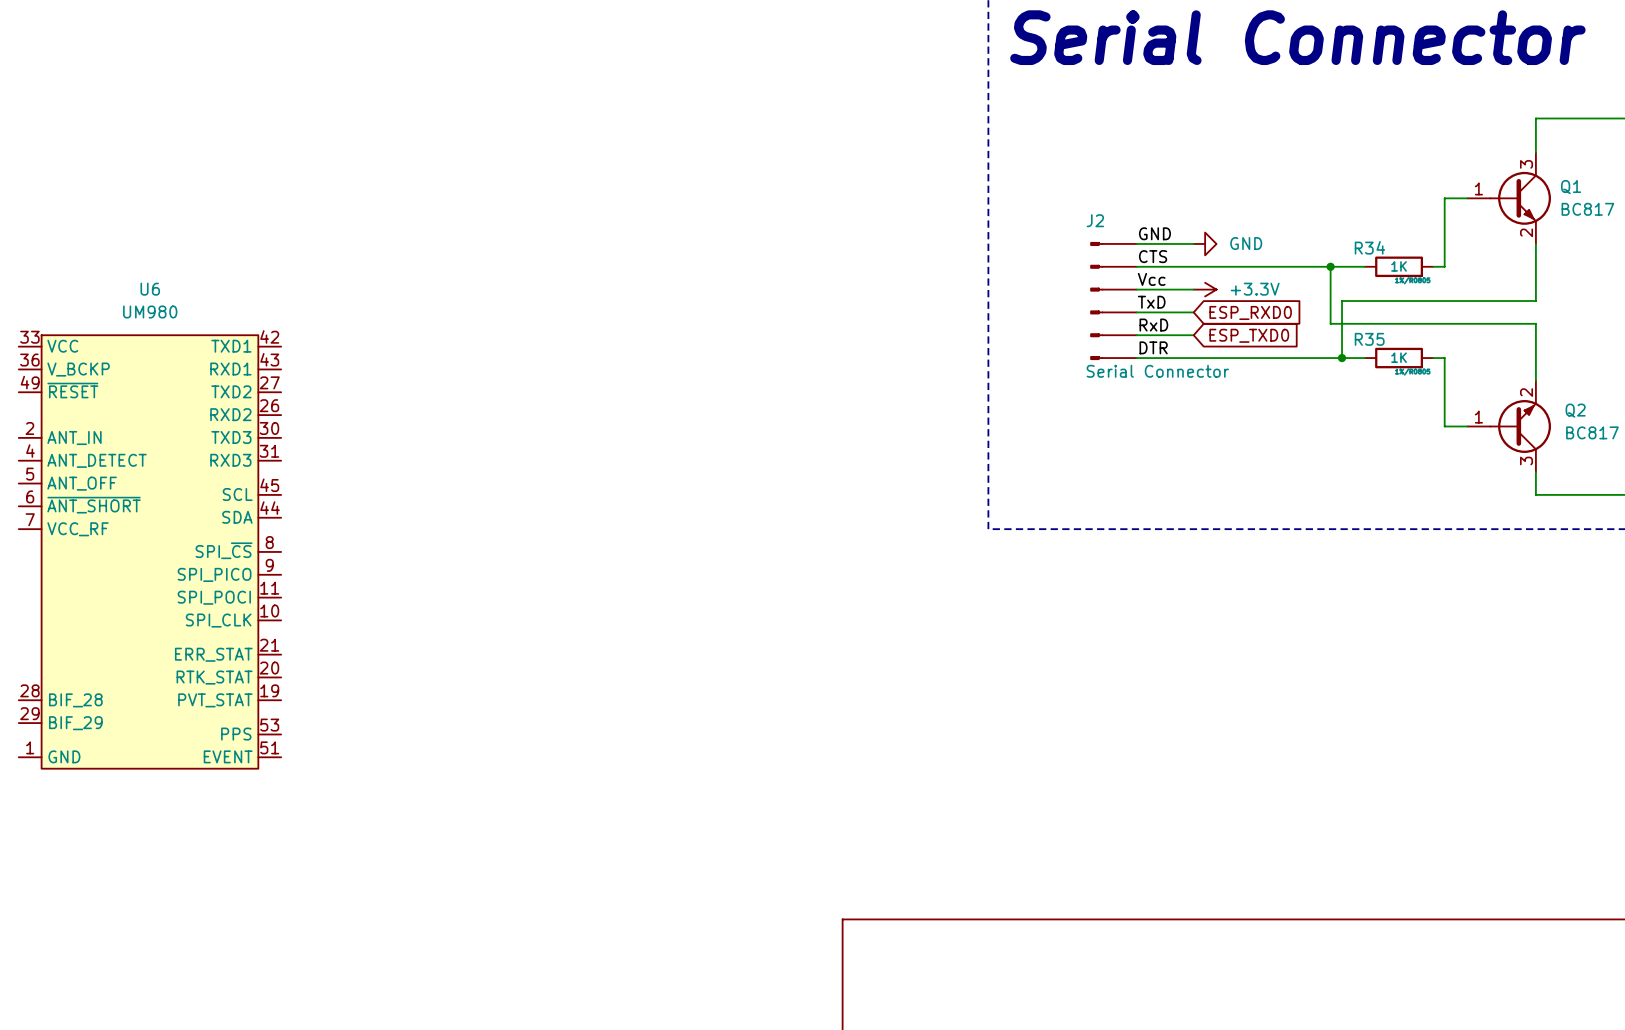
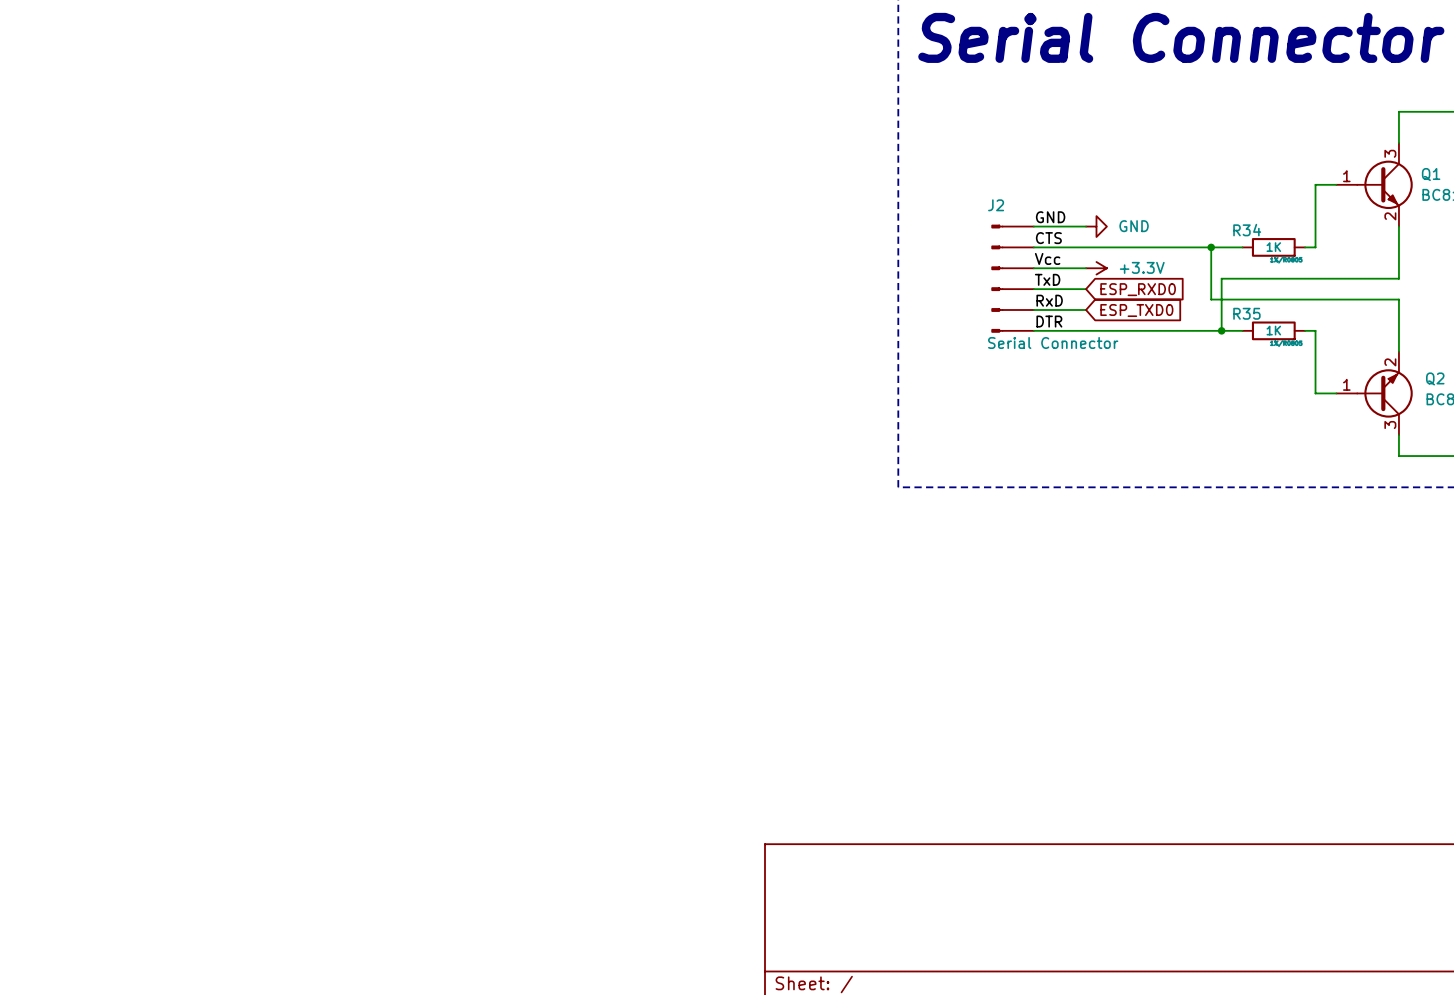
U6: UM980 (149, 551) -> none

